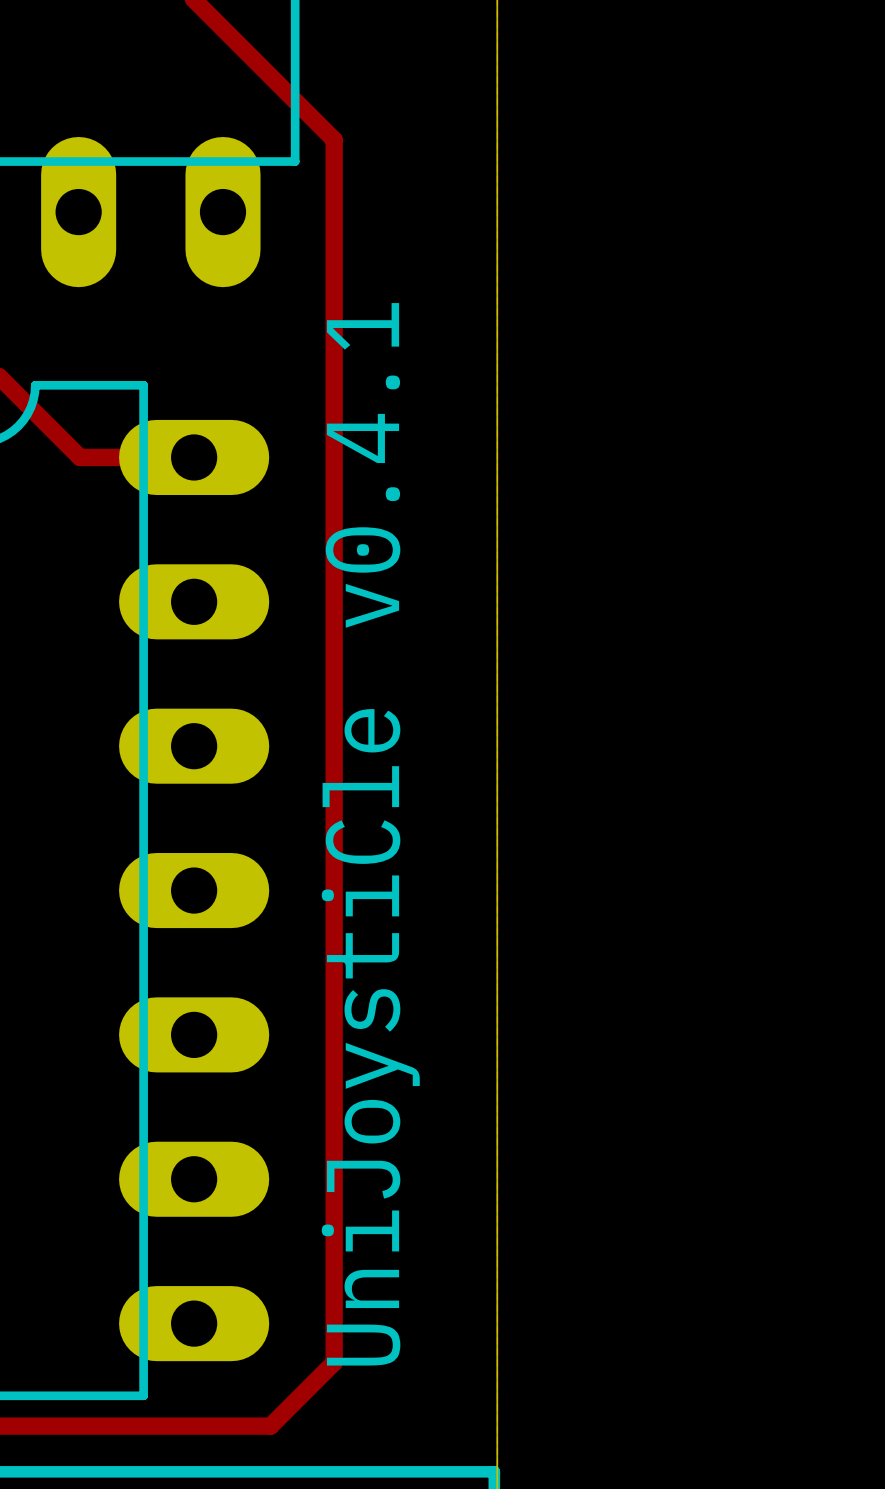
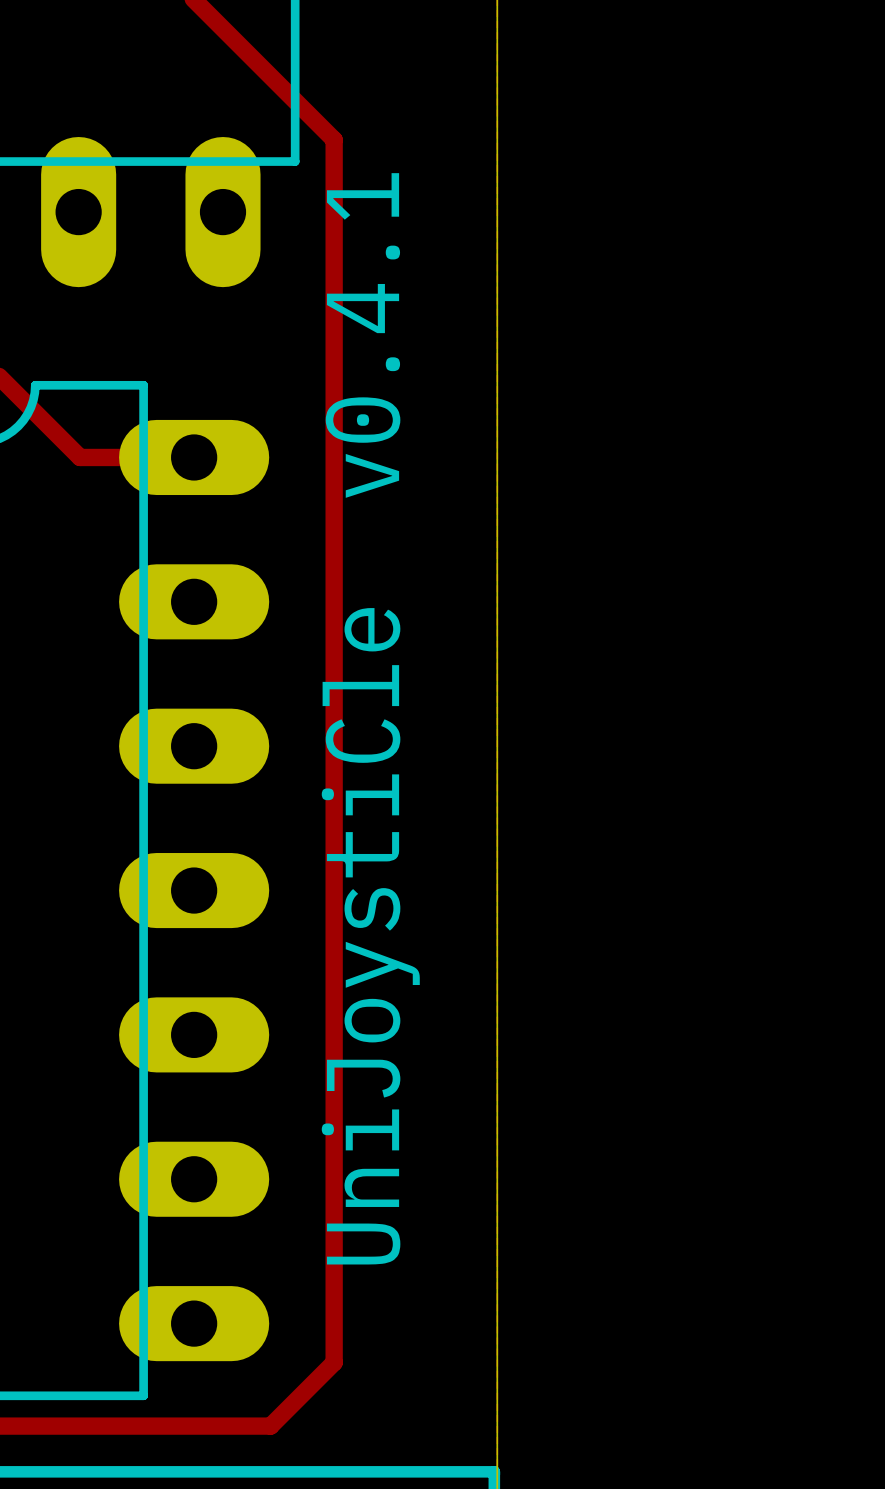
text position: v0.4.1 (363, 465) -> v0.4.1 (363, 335)
text position: UniJoystiCle (370, 1037) -> UniJoystiCle (370, 936)

